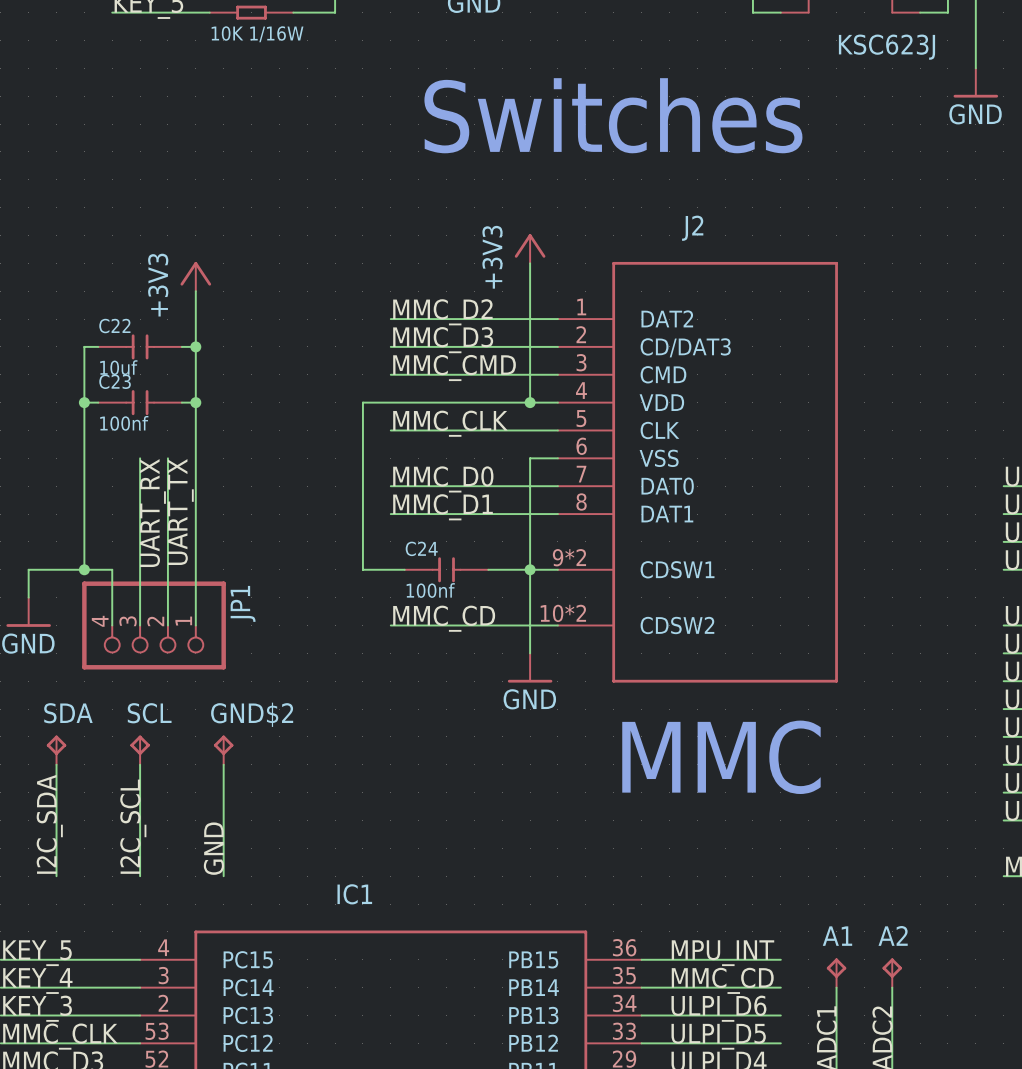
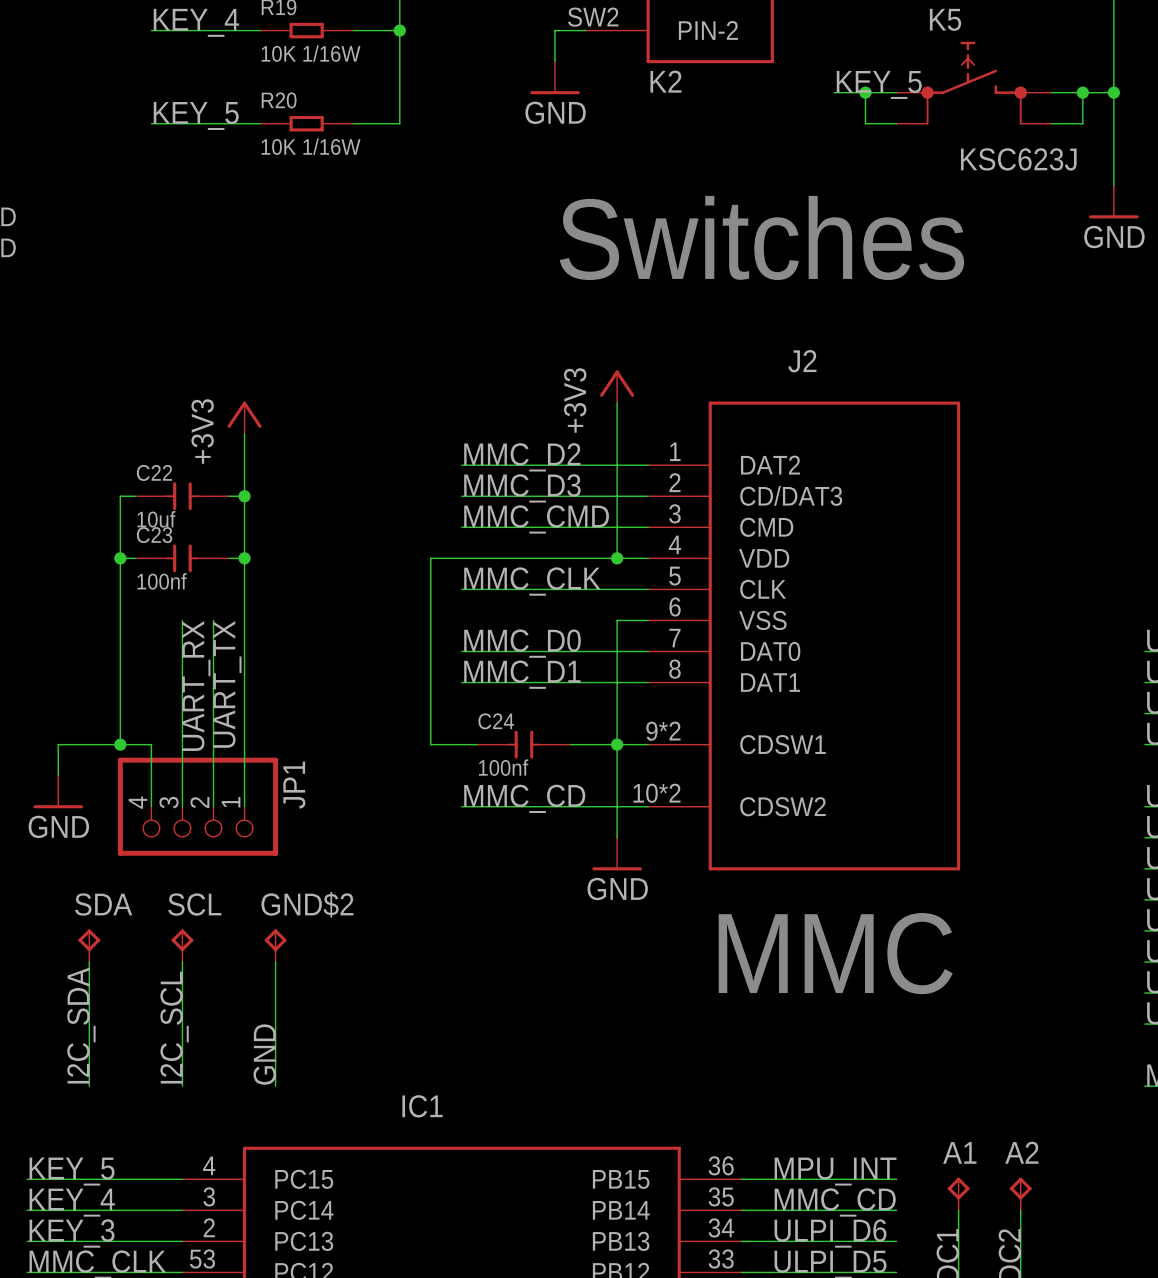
text position: Switches (613, 115) -> Switches (761, 237)

